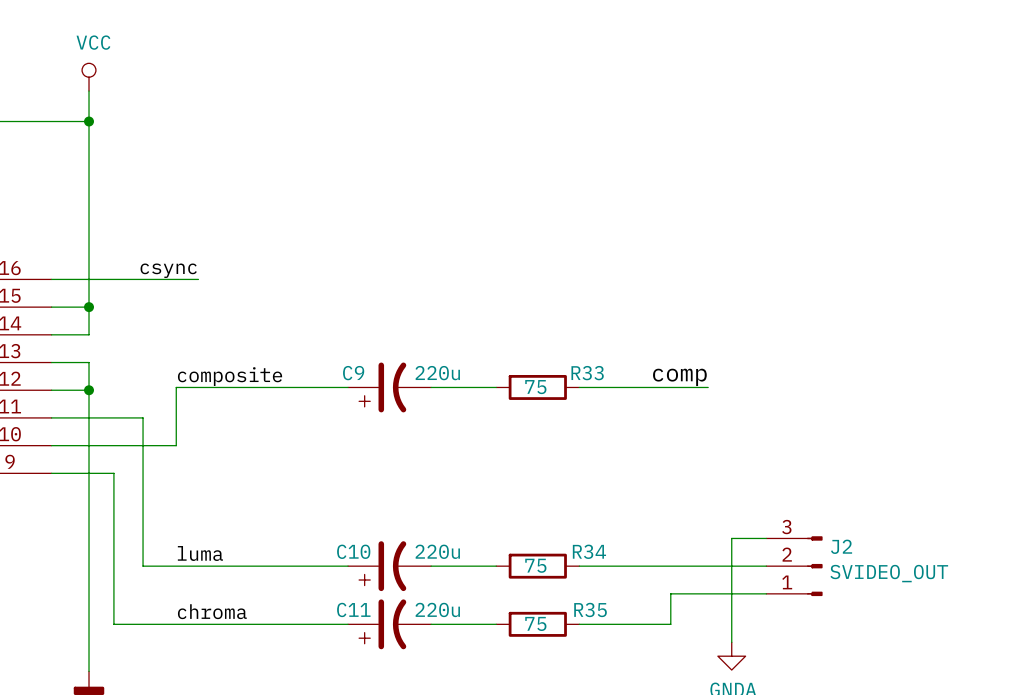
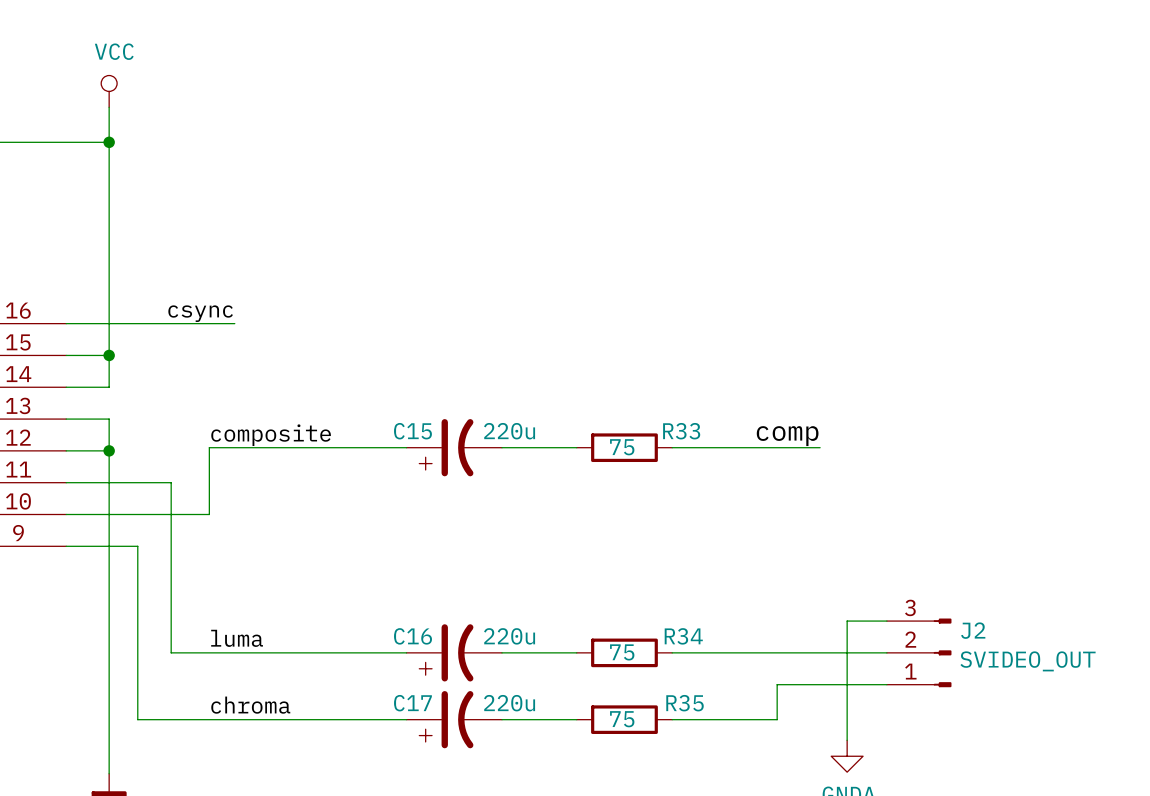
C9 name: C9 (353, 373) -> C15 (412, 431)
C10 name: C10 (353, 551) -> C16 (413, 636)
C11 name: C11 (353, 609) -> C17 (412, 703)

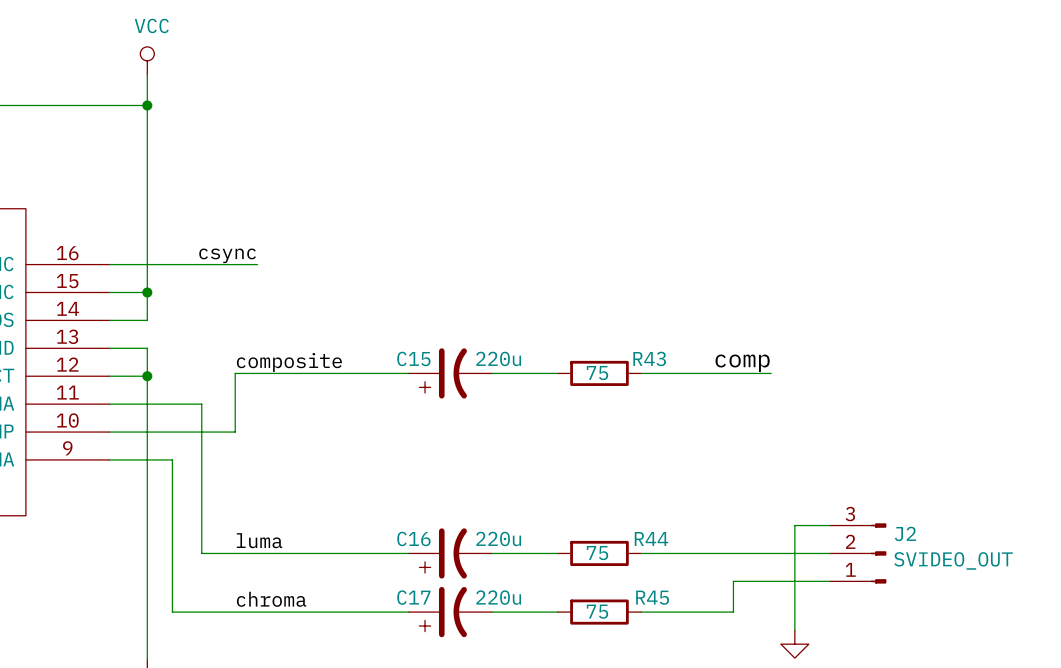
R33 name: R33 (681, 431) -> R43 (649, 358)
R34 name: R34 (683, 636) -> R44 (651, 538)
R35 name: R35 (685, 703) -> R45 (652, 597)

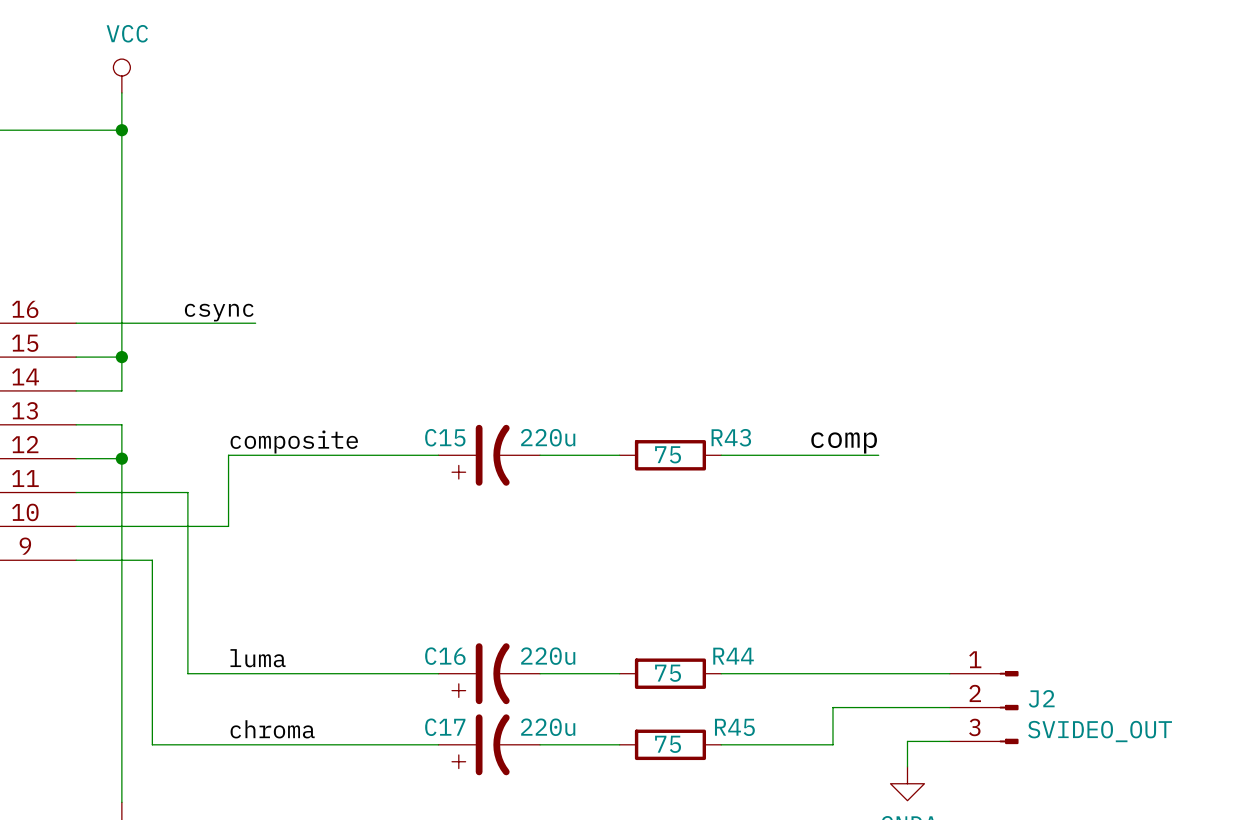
wire: (829, 525) (794, 525) (794, 609) -> (949, 741) (907, 741)
J2 flip: as is (878, 553) -> up-down (1009, 707)

